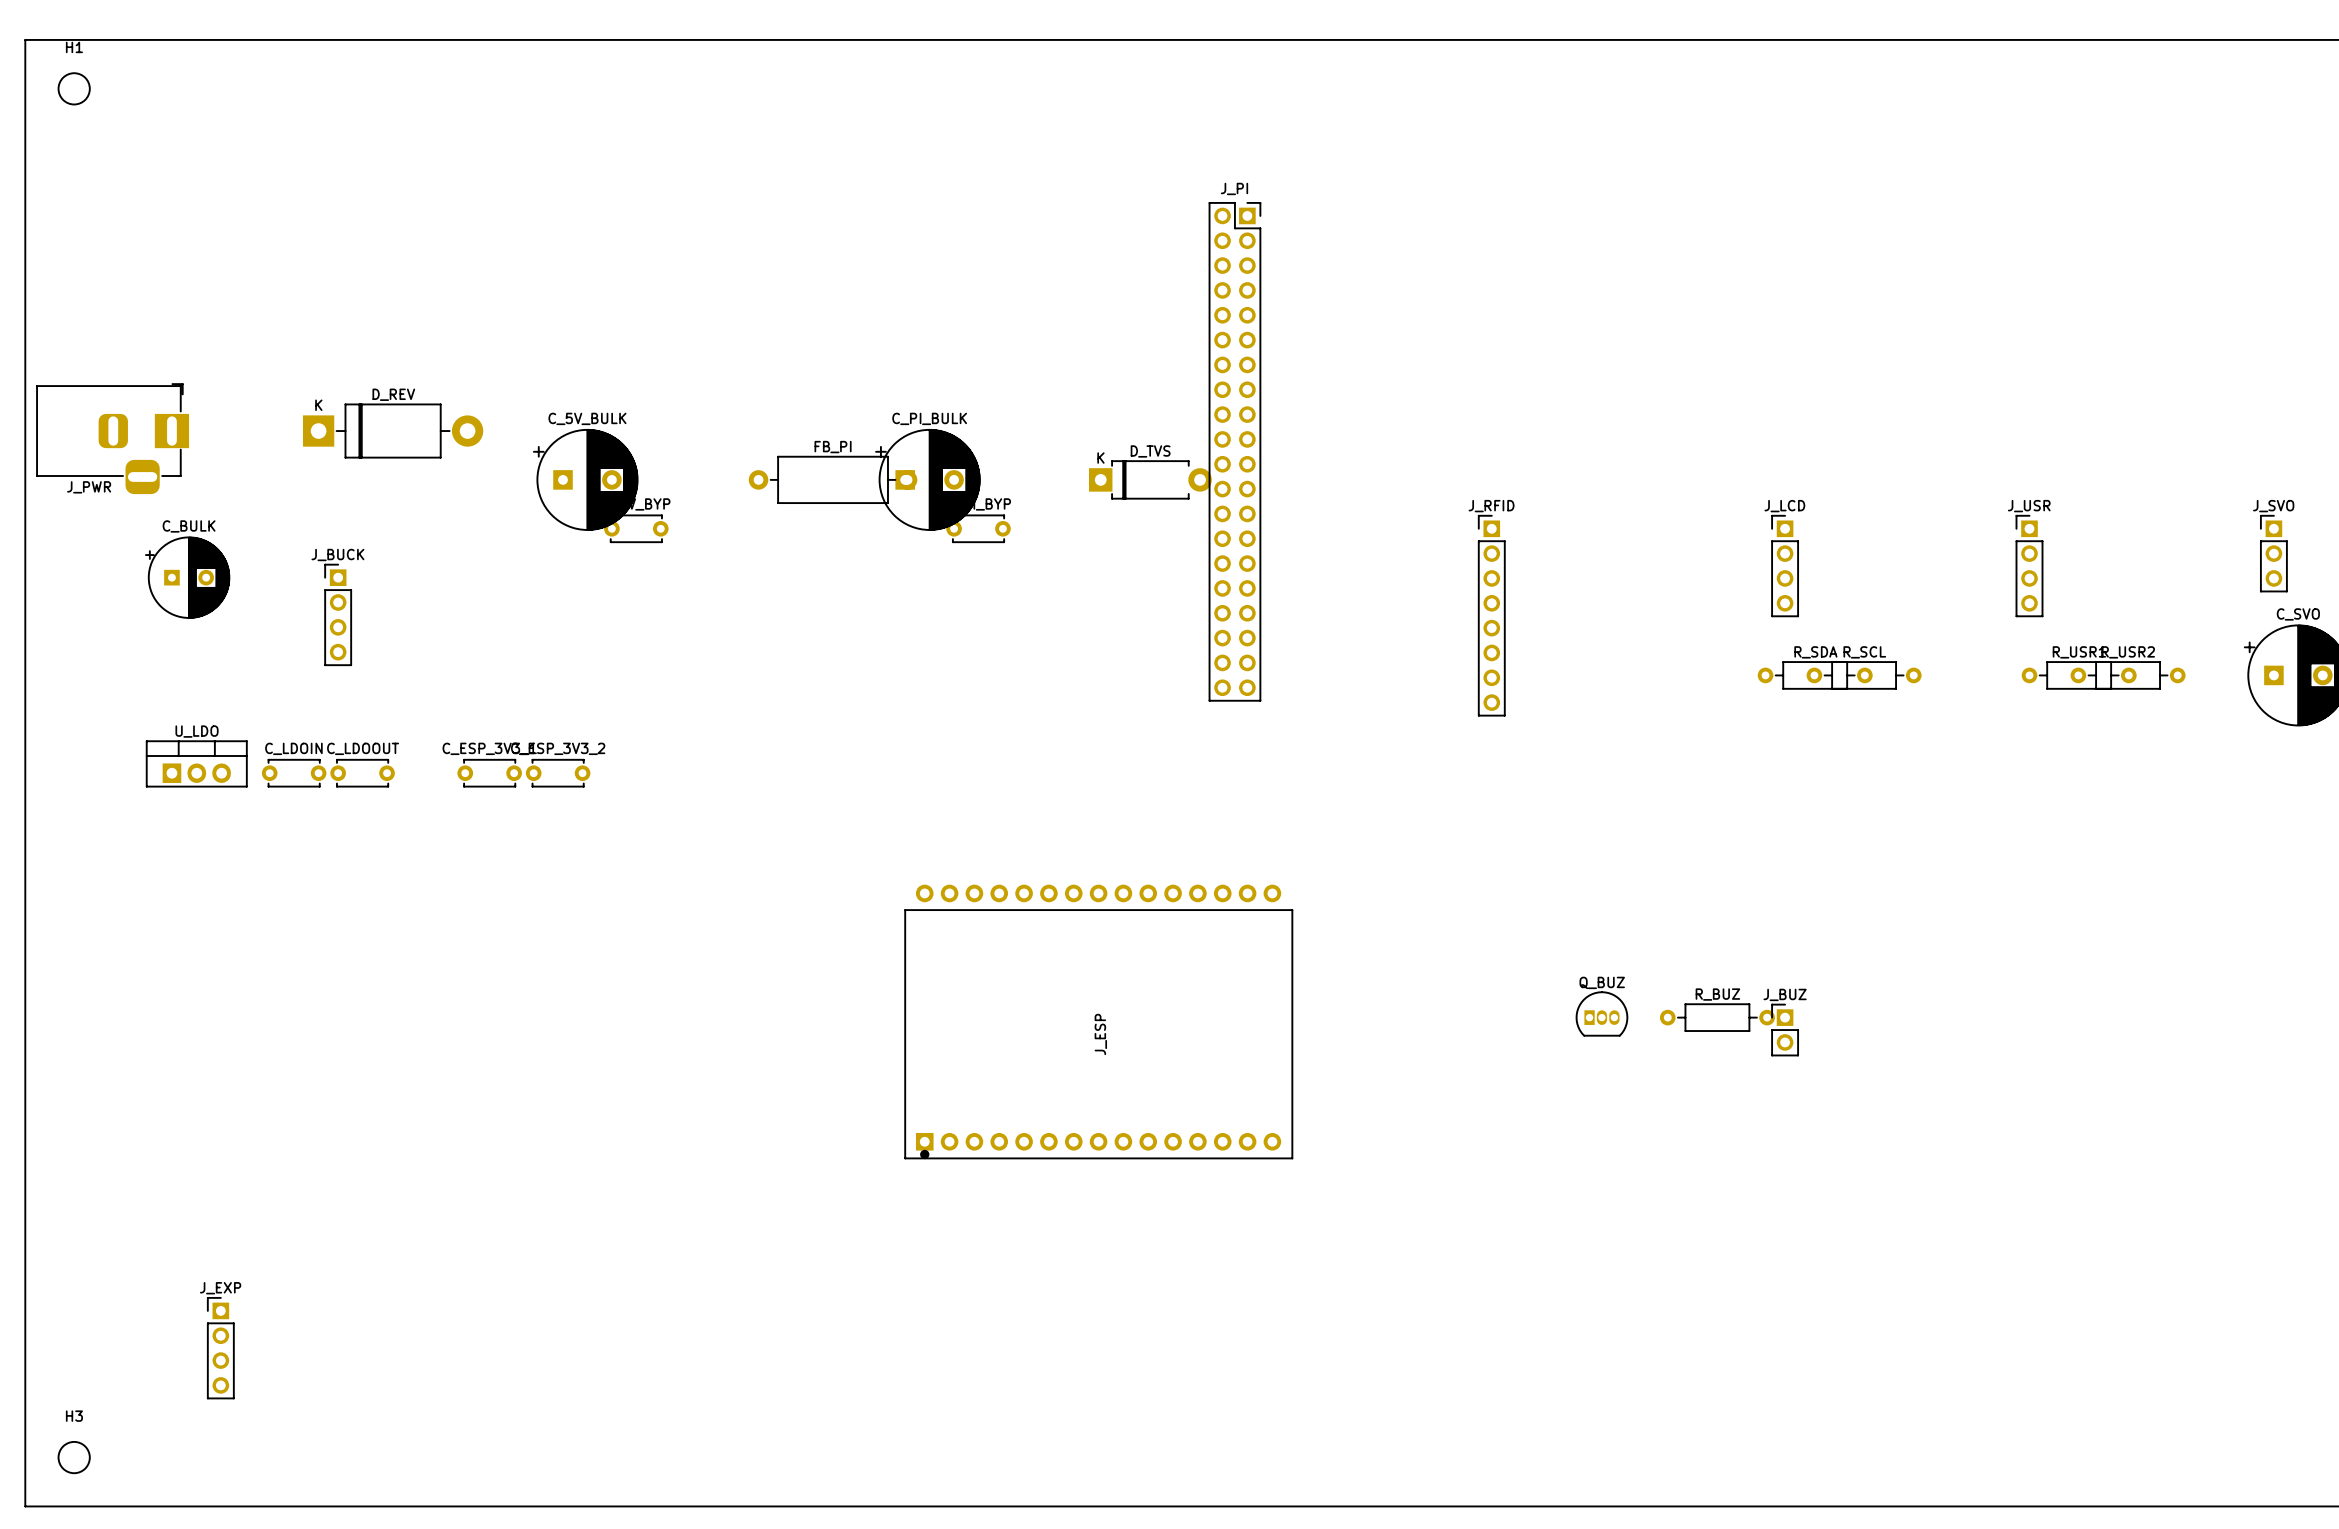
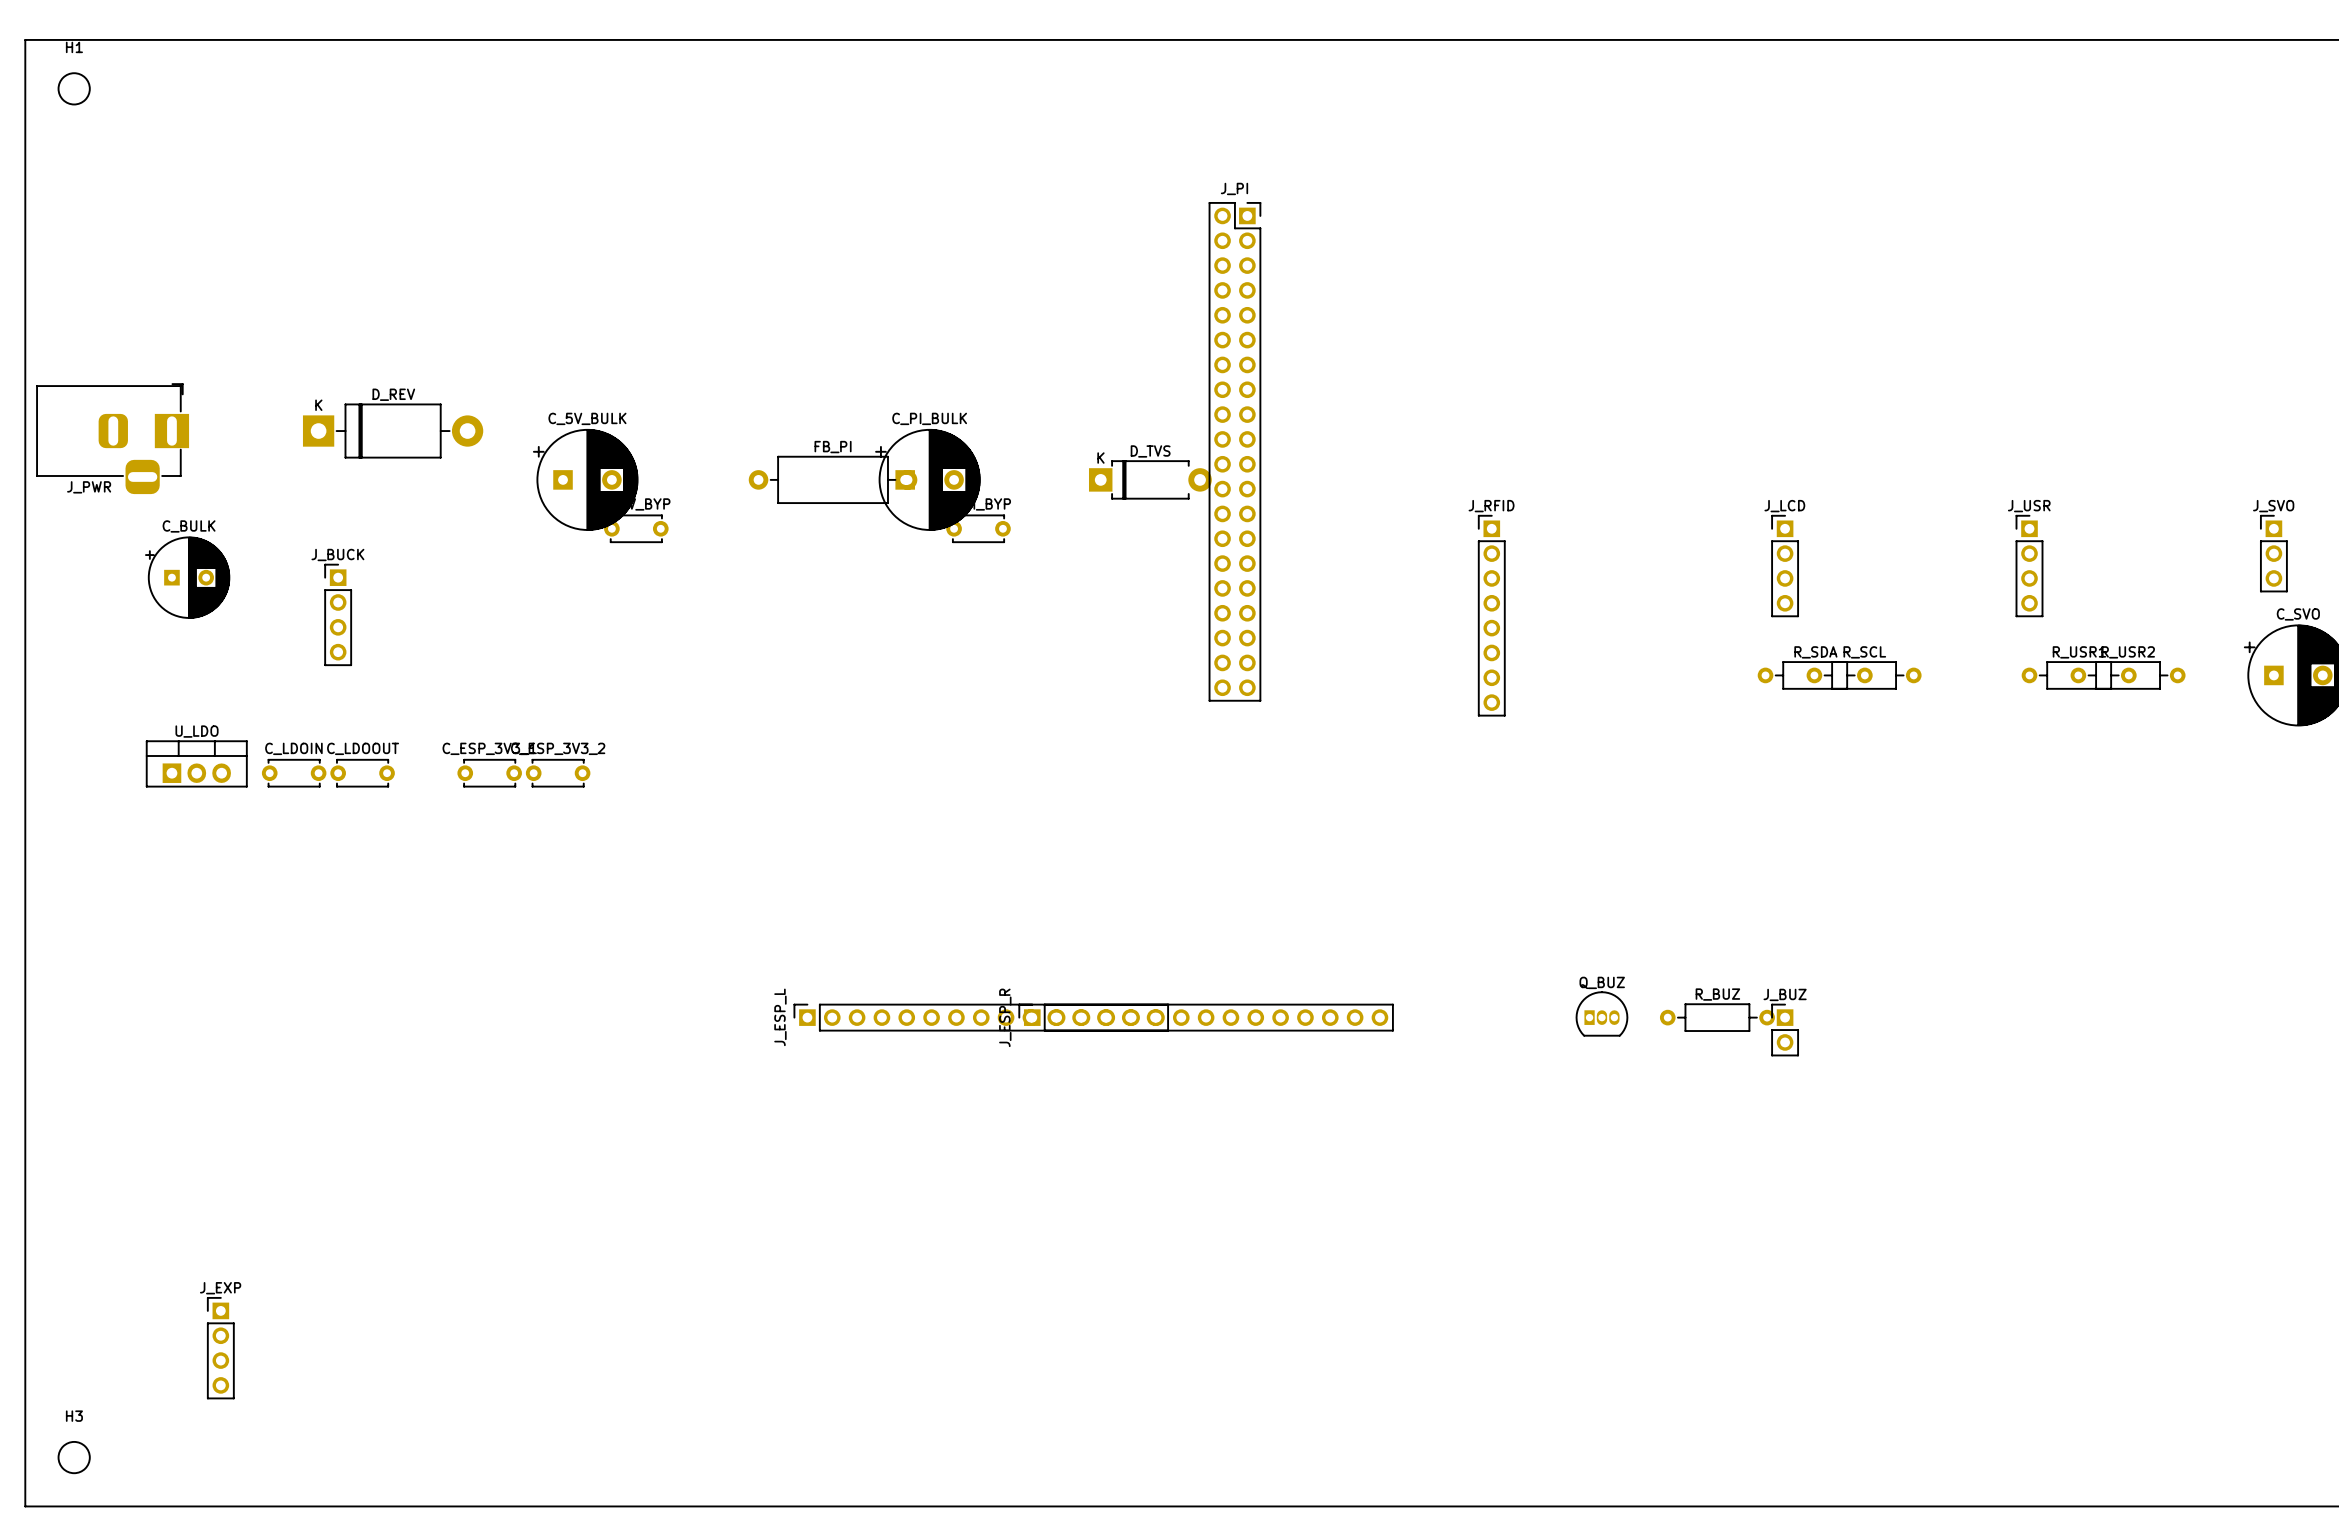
J_ESP_L: none -> (981, 1017)
J_ESP_R: none -> (1206, 1017)
J_ESP: (1098, 1021) -> none

